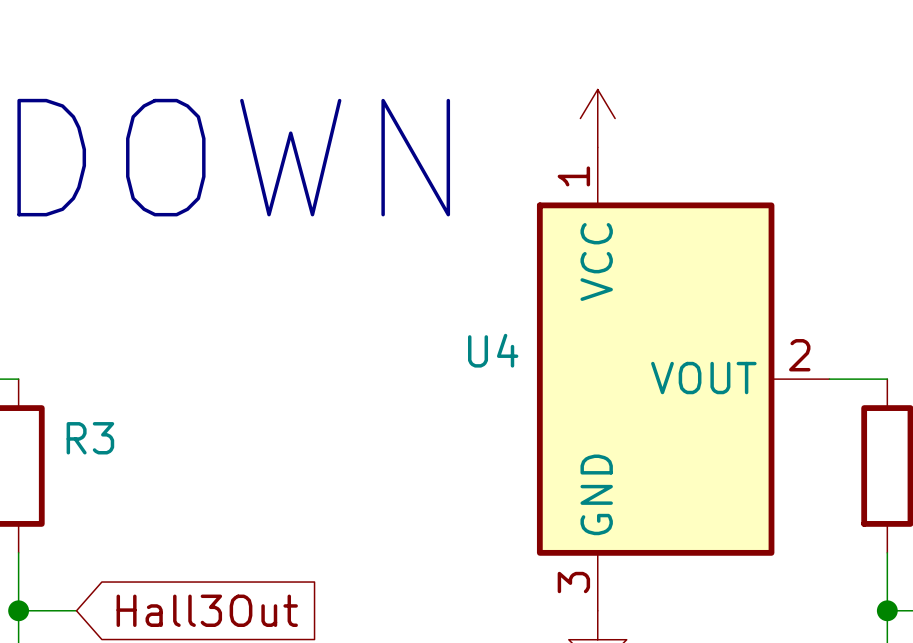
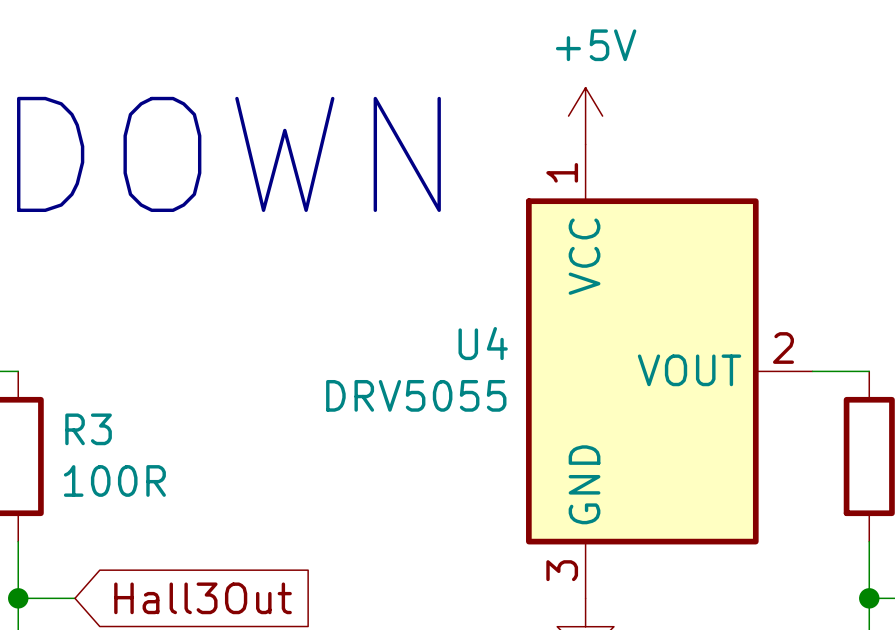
power symbol text: none -> +5V (596, 45)
U4 value: none -> DRV5055 (416, 395)
R3 value: none -> 100R (114, 480)

